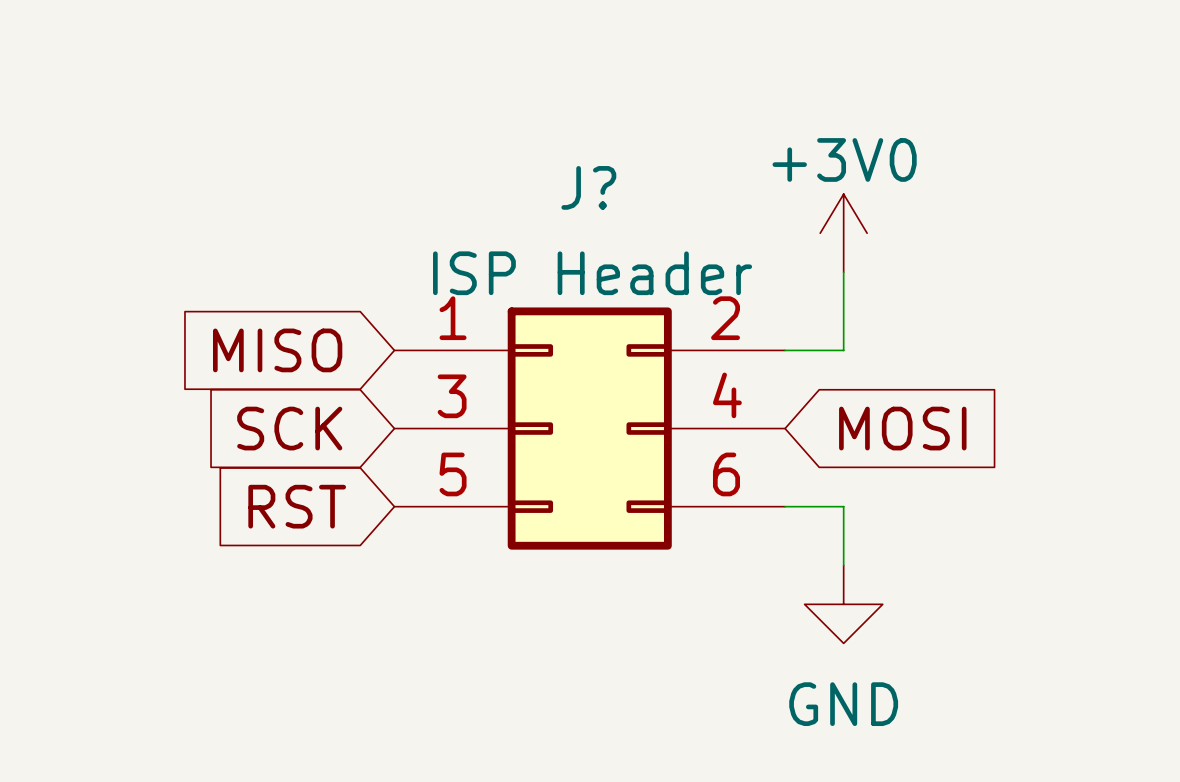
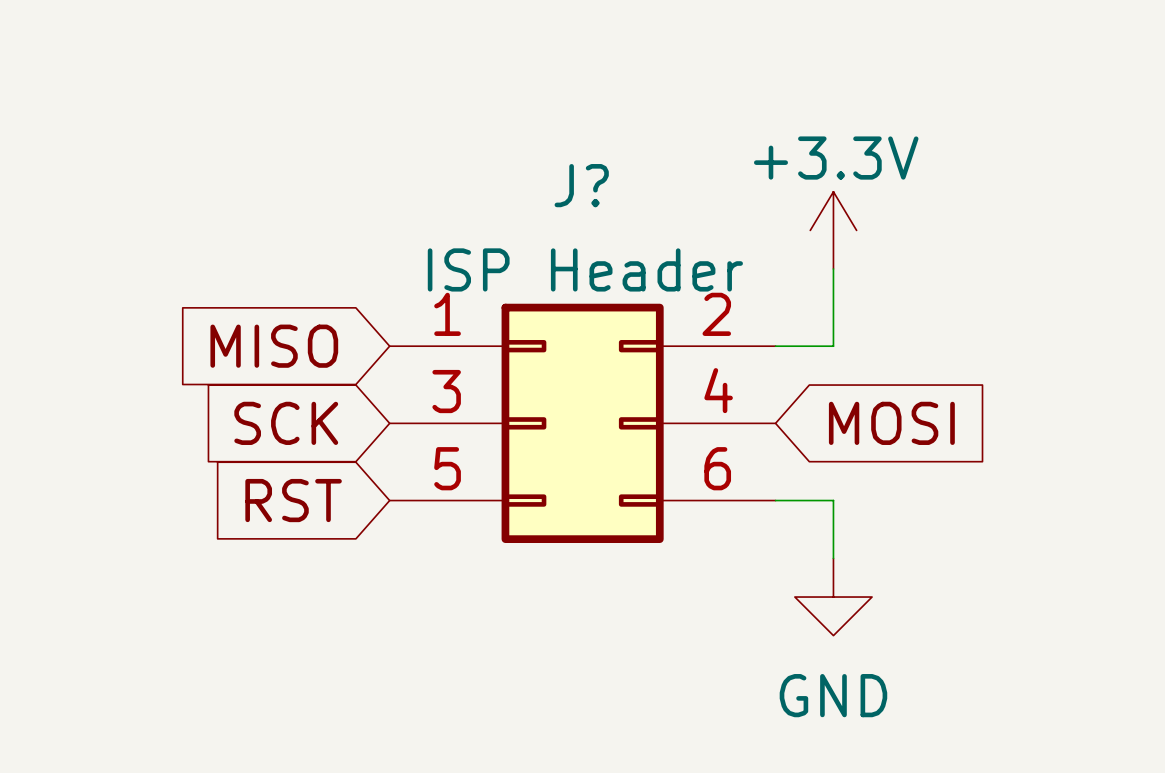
power symbol: +3V0 (843, 233) -> +3.3V (833, 230)

